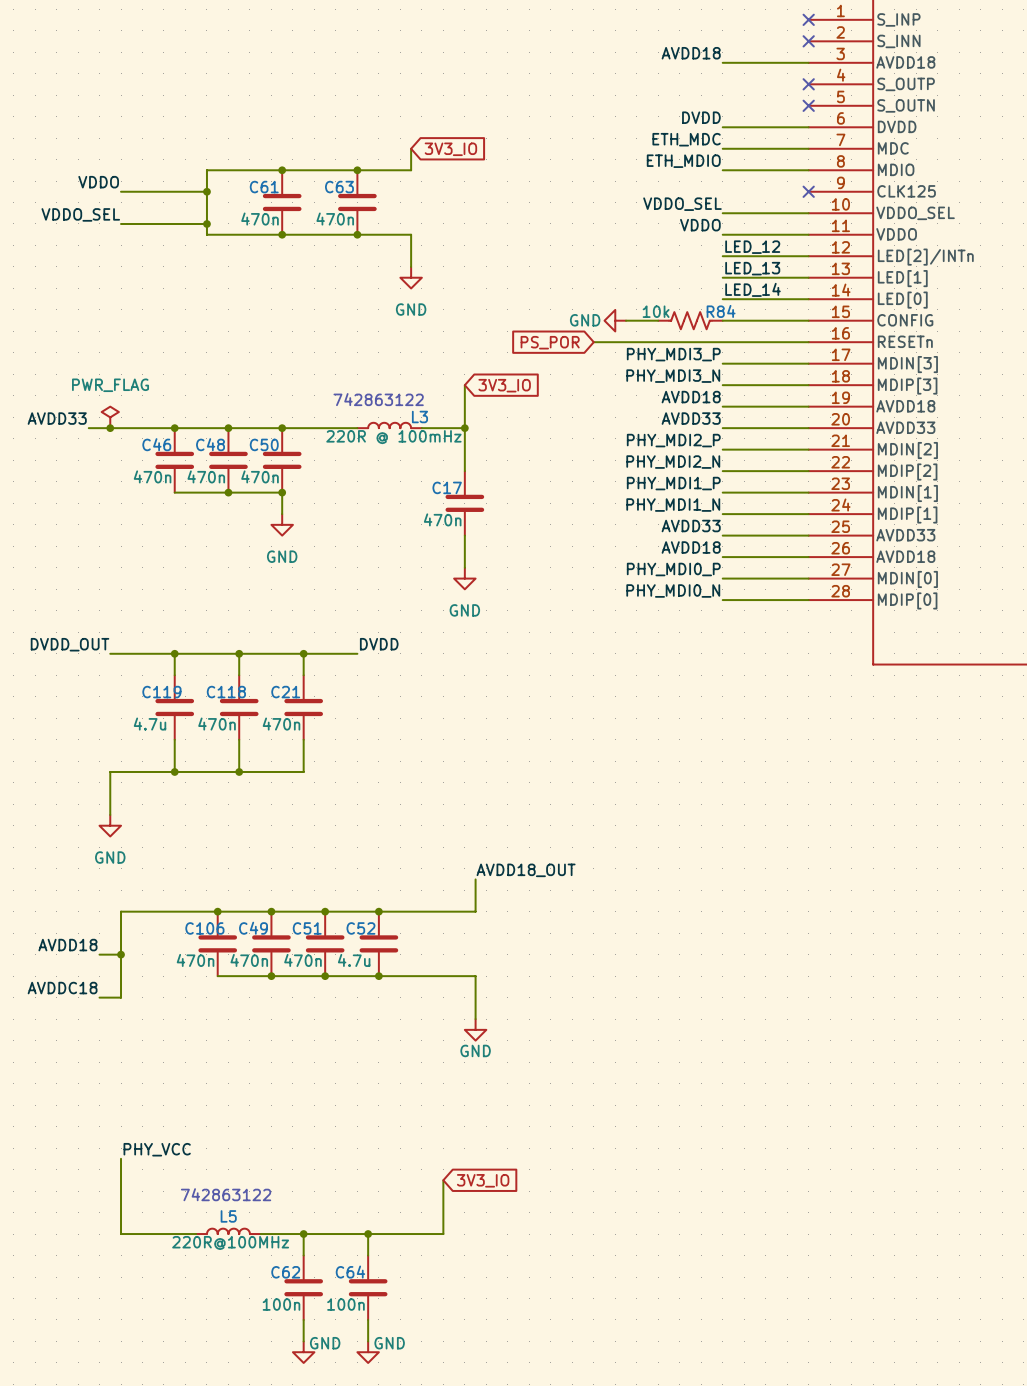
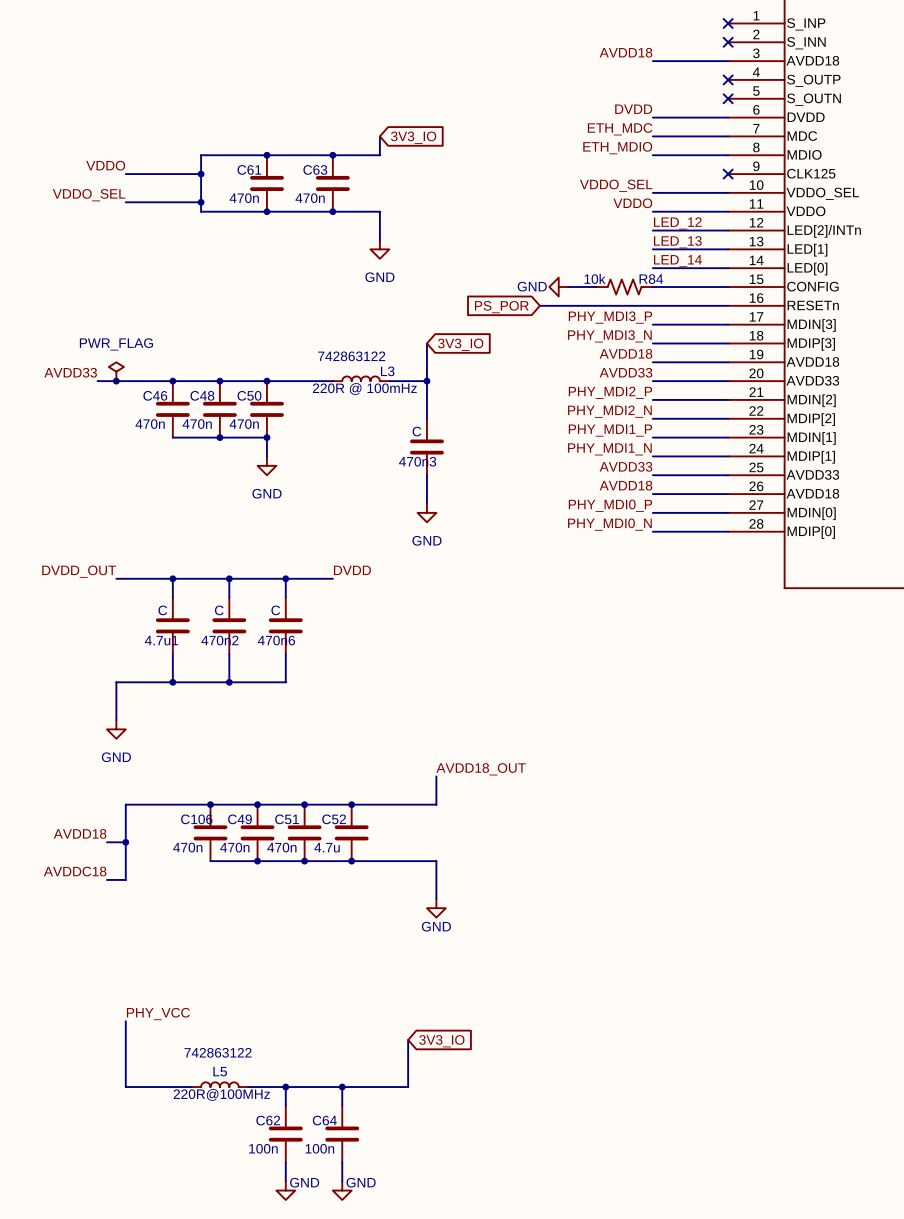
C17 name: C17 (447, 487) -> 470n3 (417, 461)
C17 value: 470n (442, 519) -> C (416, 431)
C119 name: C119 (161, 692) -> 4.7u1 (161, 640)
C118 name: C118 (226, 692) -> 470n2 (219, 640)
C21 name: C21 (285, 692) -> 470n6 (276, 640)
C119 value: 4.7u (150, 724) -> C (162, 610)
C118 value: 470n (217, 724) -> C (219, 610)
C21 value: 470n (281, 724) -> C (275, 610)

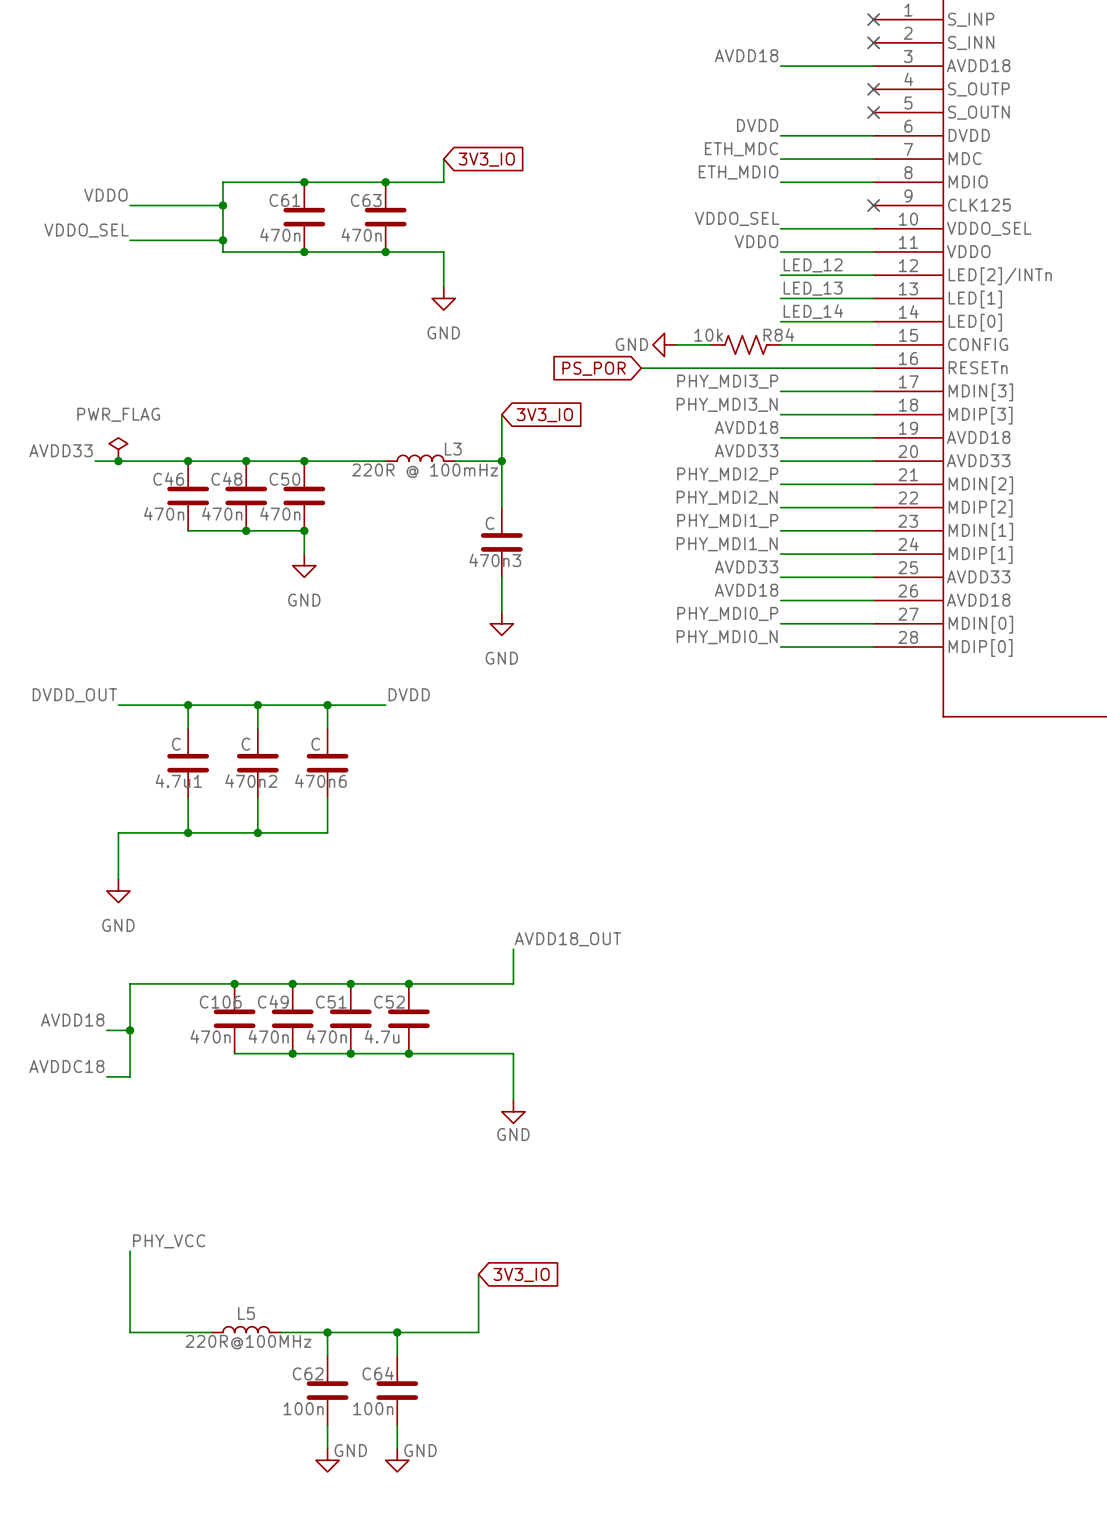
text: 742863122 (351, 356) -> none
text: 742863122 (218, 1052) -> none

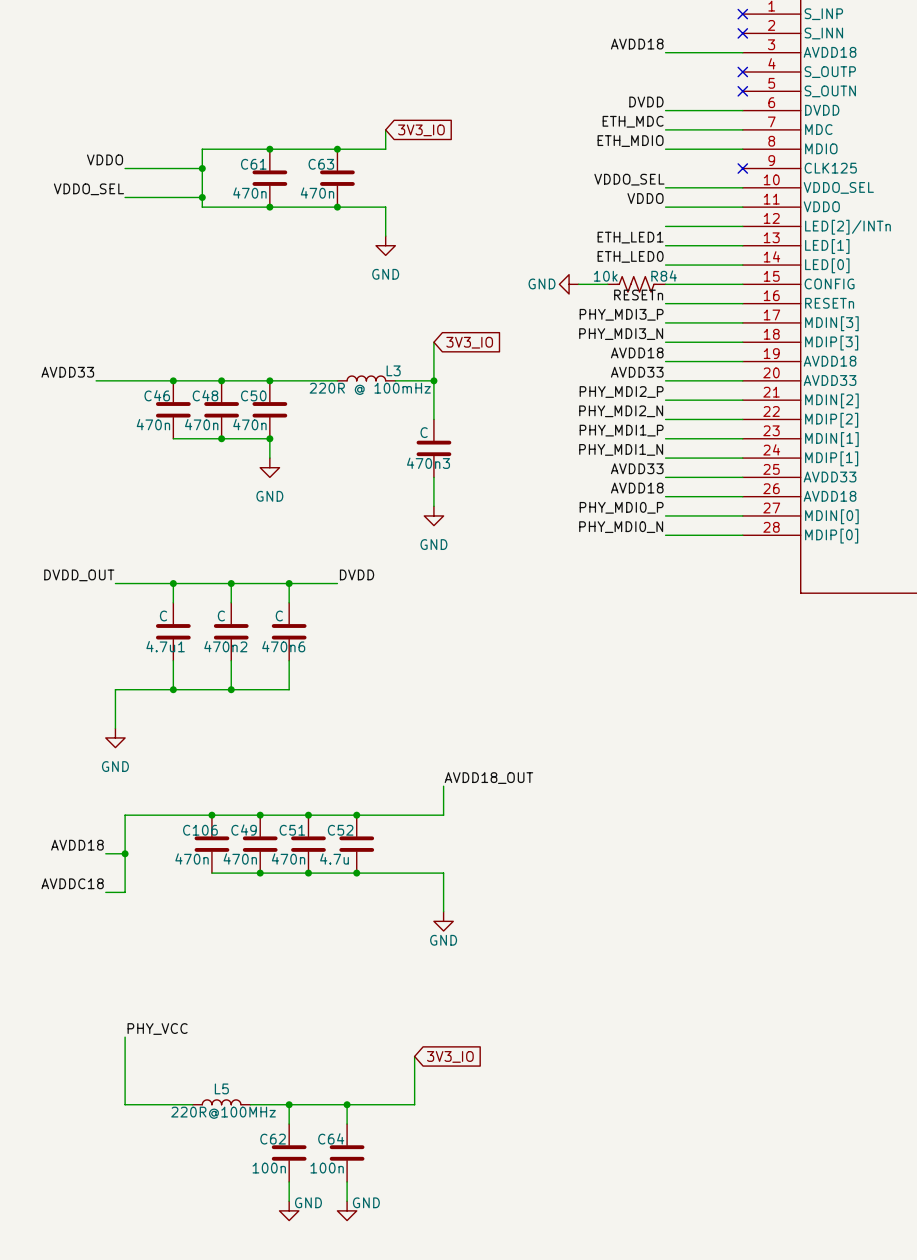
label: LED_12 (813, 265) -> none
label: LED_13 (813, 288) -> ETH_LED1 (630, 237)
label: LED_14 (813, 311) -> ETH_LED0 (630, 256)
label: none -> RESETn (638, 295)
global label: PS_POR (594, 368) -> none
wire: (641, 368) (780, 368) -> none
power symbol: PWR_FLAG (118, 449) -> none
junction: (118, 461) -> none

